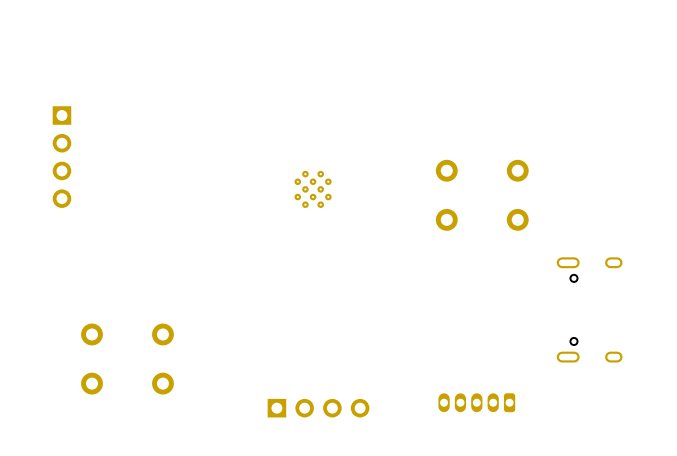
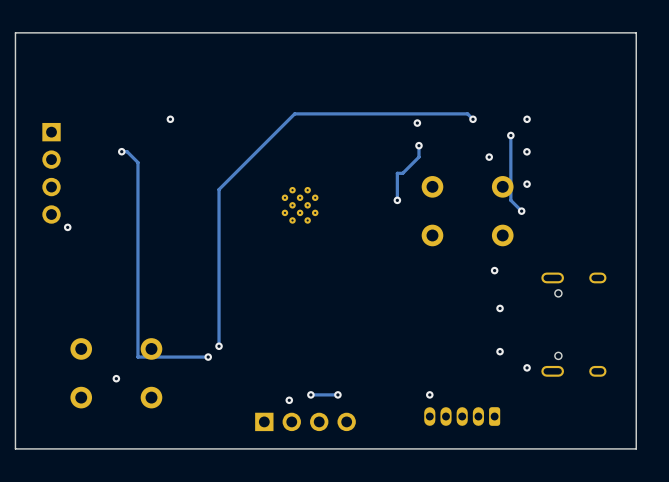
board edge: none -> (636, 32) (15, 32) (15, 448) (636, 448) (636, 32)
via: none -> (170, 119)
track: none -> (473, 119) (467, 113) (294, 113) (219, 189) (219, 346)
via: none -> (473, 119)
via: none -> (527, 119)
via: none -> (417, 123)
track: none -> (510, 135) (510, 200) (521, 211)
via: none -> (510, 135)
track: none -> (418, 145) (418, 157) (402, 173) (397, 173) (397, 200)
via: none -> (418, 145)
track: none -> (121, 151) (127, 151) (137, 162) (137, 357) (208, 357)
via: none -> (121, 151)
via: none -> (526, 151)
via: none -> (489, 157)
via: none -> (527, 184)
via: none -> (397, 200)
via: none -> (521, 211)
via: none -> (67, 227)
via: none -> (494, 270)
via: none -> (500, 308)
via: none -> (219, 346)
via: none -> (500, 351)
via: none -> (208, 357)
via: none -> (527, 367)
via: none -> (116, 378)
via: none -> (310, 394)
track: none -> (337, 394) (310, 394)
via: none -> (337, 394)
via: none -> (429, 394)
via: none -> (289, 400)

